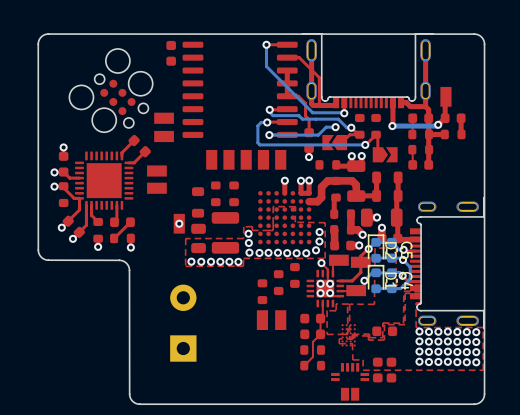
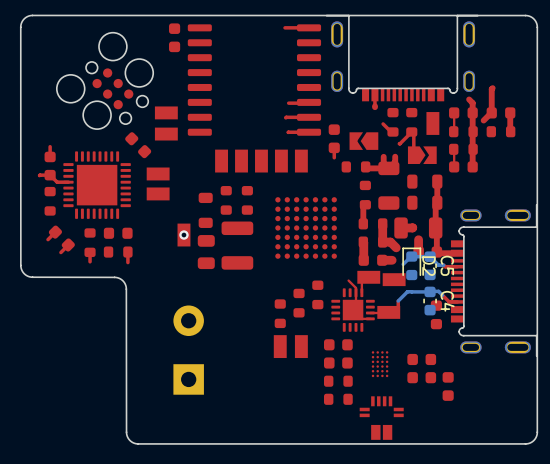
bottom track: (266, 44) (266, 66) (312, 112) (344, 113) -> none
via: (266, 44) -> none
top track: (311, 50) (311, 103) (333, 105) -> none
top track: (425, 50) (425, 106) (410, 106) (406, 102) (401, 102) (402, 103) -> none
top track: (287, 57) (299, 57) (319, 77) (319, 105) -> none
top track: (287, 70) (287, 96) (298, 96) (305, 103) (305, 115) (309, 119) (309, 132) -> none
part position: (445, 96) -> (432, 123)
top track: (392, 102) (392, 126) -> none
bottom track: (269, 109) (273, 115) (298, 115) (302, 119) (338, 119) (346, 127) (351, 127) -> none
via: (269, 109) -> none
via: (344, 113) -> none
bottom track: (267, 122) (261, 122) (257, 125) (257, 142) (260, 144) (365, 144) -> none
via: (267, 122) -> none
bottom track: (438, 124) (392, 126) -> none
via: (438, 124) -> none
via: (392, 126) -> none
bottom track: (335, 127) (326, 127) (318, 135) (269, 135) -> none
via: (335, 127) -> none
via: (351, 127) -> none
top track: (359, 134) (349, 134) (342, 142) -> none
top track: (444, 134) (429, 134) -> none
via: (269, 135) -> none
top track: (134, 140) (121, 152) (121, 155) -> none
via: (365, 144) -> none
via: (63, 147) -> none
top track: (145, 151) (134, 162) (128, 162) -> none
via: (351, 156) -> none
via: (361, 156) -> none
via: (309, 157) -> none
via: (54, 172) -> none
top track: (376, 177) (376, 195) (356, 196) (356, 184) (352, 180) (327, 180) (321, 187) (321, 197) (317, 201) (309, 201) -> none
via: (284, 180) -> none
via: (301, 180) -> none
via: (309, 180) -> none
top track: (284, 183) (284, 193) -> none
top track: (309, 183) (309, 193) (301, 193) (301, 183) -> none
top track: (54, 186) (63, 186) (74, 198) (79, 198) (79, 209) (68, 221) -> none
via: (54, 186) -> none
top track: (86, 205) (86, 225) (79, 232) -> none
top track: (91, 205) (91, 215) (98, 221) -> none
top track: (116, 205) (116, 219) (114, 222) -> none
top zone outline: (273, 206) (295, 206) (295, 222) (325, 222) (325, 258) (243, 258) (243, 266) (185, 266) (185, 238) (243, 238) (243, 226) (252, 226) (252, 230) (273, 230) (273, 206) -> none
via: (376, 217) -> none
top track: (130, 222) (114, 238) -> none
via: (61, 227) -> none
via: (381, 227) -> none
via: (319, 232) -> none
via: (248, 233) -> none
via: (362, 234) -> none
via: (72, 238) -> none
via: (319, 241) -> none
via: (248, 243) -> none
via: (359, 245) -> none
via: (98, 246) -> none
via: (130, 247) -> none
top zone outline: (396, 248) (396, 285) (421, 285) (421, 291) (403, 291) (403, 323) (382, 322) (382, 337) (369, 337) (369, 334) (352, 334) (352, 338) (349, 338) (349, 304) (374, 304) (375, 248) (396, 248) -> none
top track: (368, 249) (360, 256) (360, 272) (352, 280) (340, 280) -> none
via: (368, 249) -> none
via: (403, 249) -> none
via: (316, 250) -> none
via: (249, 252) -> none
via: (259, 252) -> none
via: (268, 252) -> none
via: (277, 252) -> none
via: (287, 253) -> none
via: (296, 253) -> none
via: (306, 253) -> none
bottom track: (376, 258) (401, 258) (410, 267) (410, 278) (400, 288) (376, 288) -> none
via: (403, 259) -> none
via: (191, 261) -> none
via: (201, 261) -> none
via: (211, 261) -> none
via: (220, 261) -> none
via: (229, 261) -> none
via: (238, 261) -> none
via: (321, 263) -> none
via: (402, 275) -> none
D1 side: bottom (376, 279) -> top (436, 314)
via: (364, 280) -> none
via: (320, 283) -> none
via: (330, 283) -> none
via: (320, 293) -> none
via: (330, 293) -> none
top zone outline: (420, 293) (420, 303) (416, 302) (416, 327) (483, 327) (483, 370) (363, 370) (363, 359) (352, 359) (352, 343) (339, 343) (339, 338) (353, 339) (353, 335) (368, 335) (368, 340) (384, 340) (384, 324) (405, 324) (405, 293) (420, 293) -> none
top track: (322, 303) (320, 334) -> none
top zone outline: (336, 303) (348, 304) (347, 334) (327, 334) (327, 310) (335, 310) (336, 303) -> none
via: (419, 331) -> none
via: (428, 331) -> none
via: (438, 331) -> none
via: (447, 331) -> none
via: (457, 331) -> none
via: (466, 332) -> none
via: (476, 332) -> none
top track: (320, 334) (312, 341) (312, 356) (304, 365) -> none
via: (419, 341) -> none
via: (428, 341) -> none
via: (438, 341) -> none
via: (447, 341) -> none
via: (457, 341) -> none
via: (466, 341) -> none
via: (476, 342) -> none
part: none -> (421, 377)
via: (419, 351) -> none
via: (428, 351) -> none
via: (438, 351) -> none
via: (447, 351) -> none
via: (457, 351) -> none
via: (466, 352) -> none
via: (476, 352) -> none
part: none -> (448, 386)
via: (419, 361) -> none
via: (438, 361) -> none
via: (447, 361) -> none
via: (428, 362) -> none
via: (457, 362) -> none
via: (466, 362) -> none
via: (476, 362) -> none
part: (377, 370) -> none
part: (391, 370) -> none

